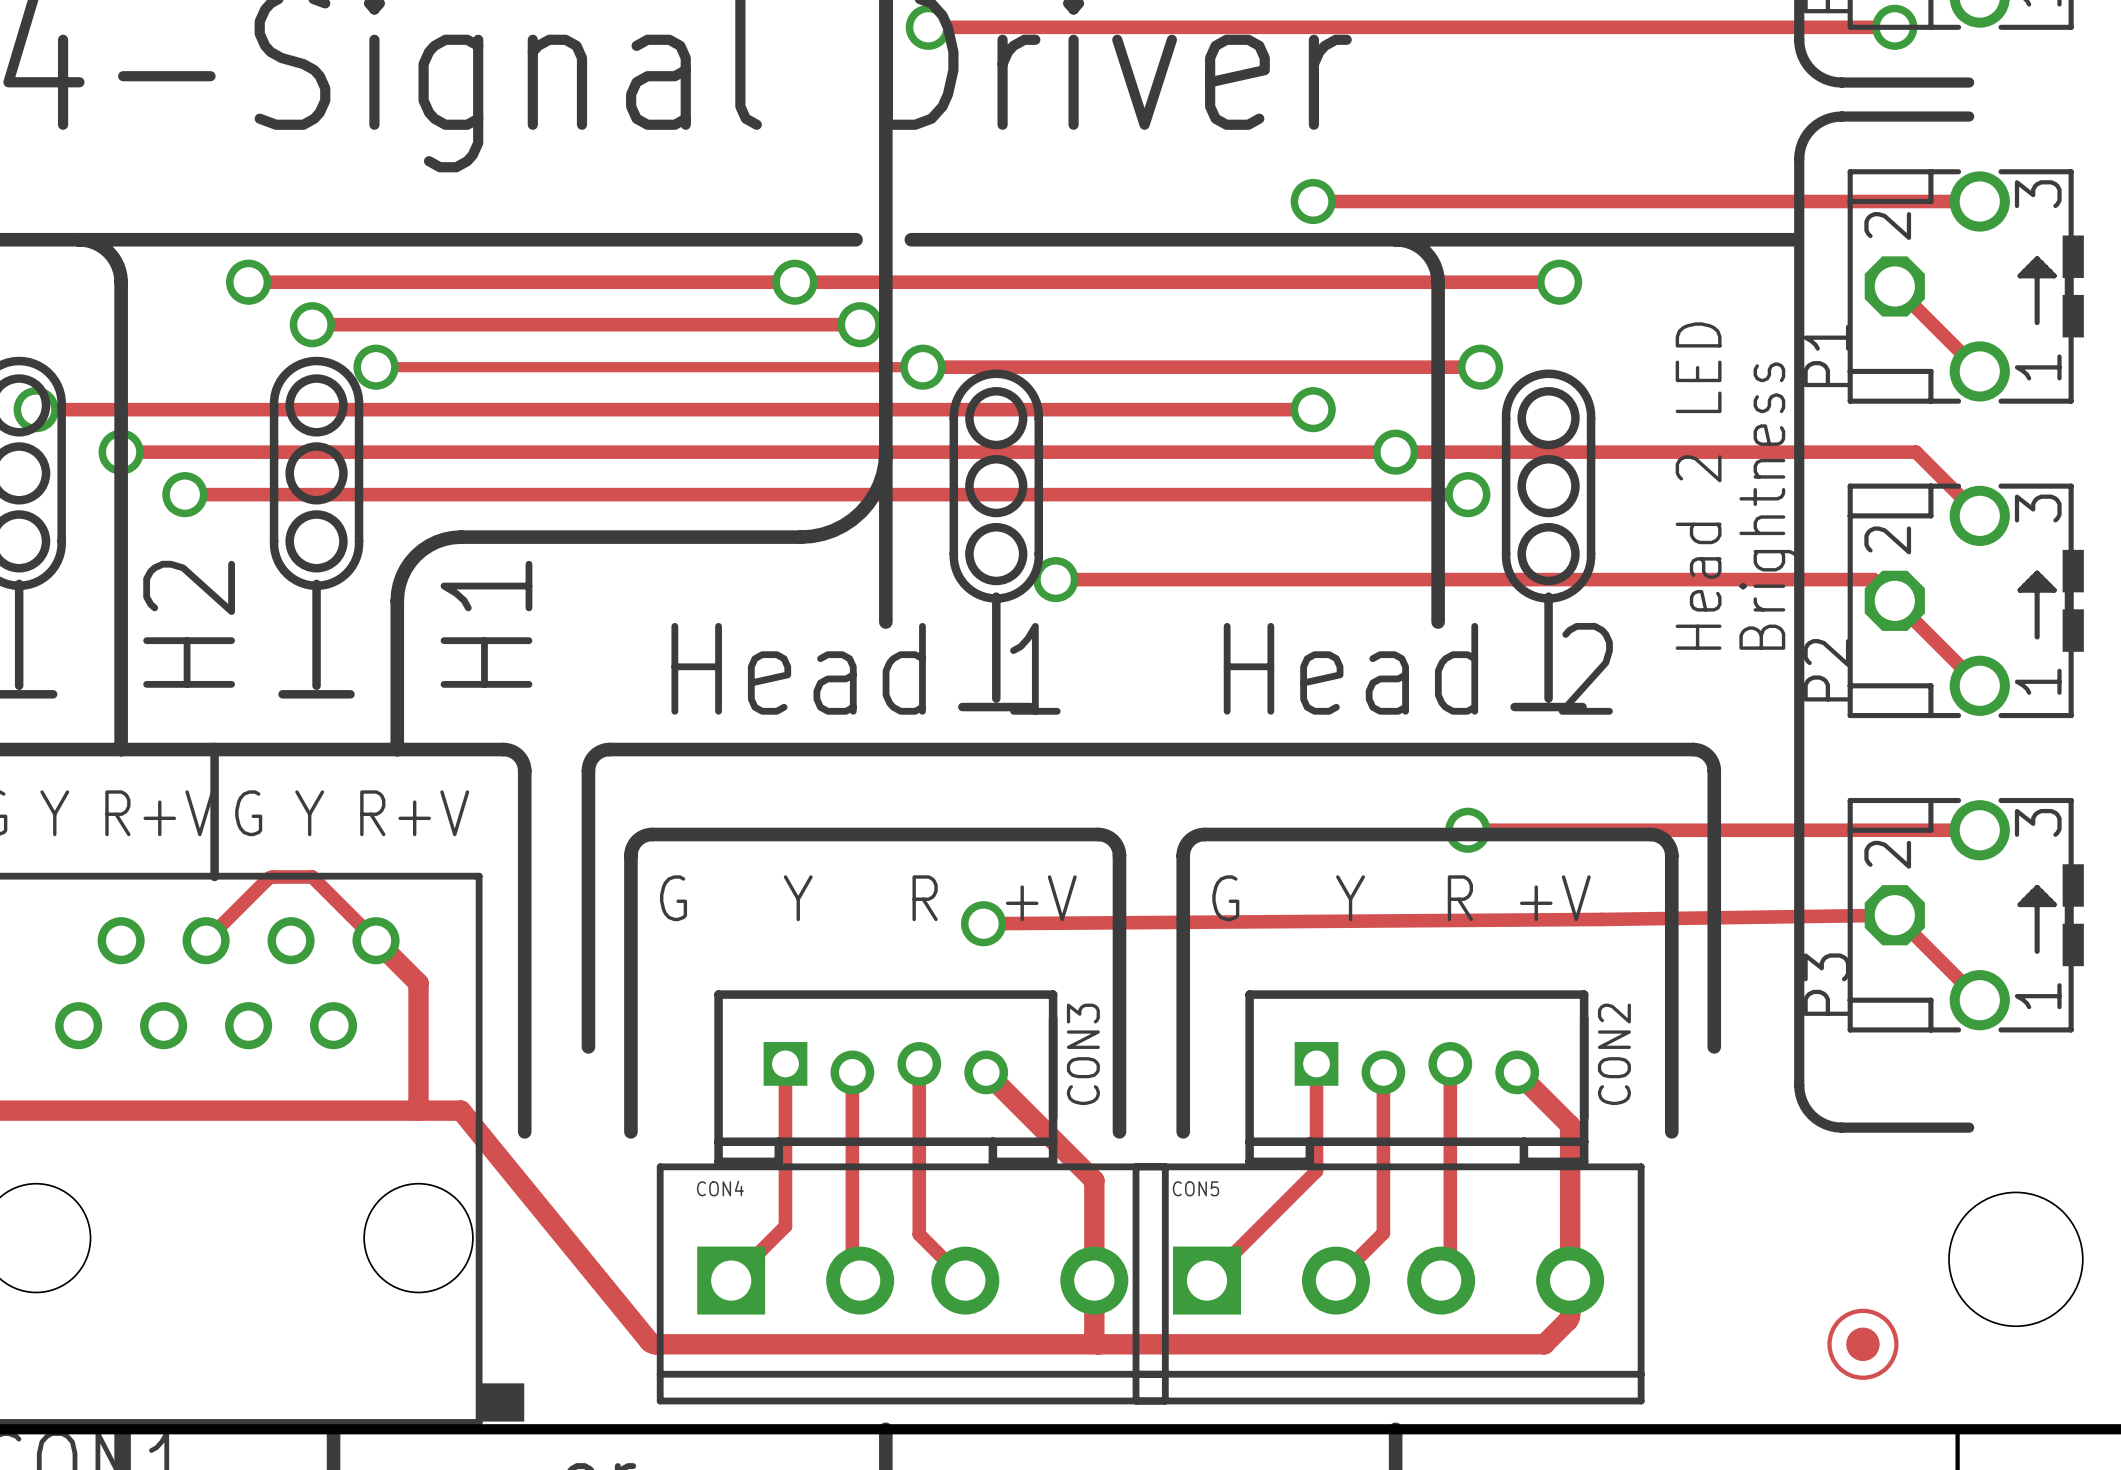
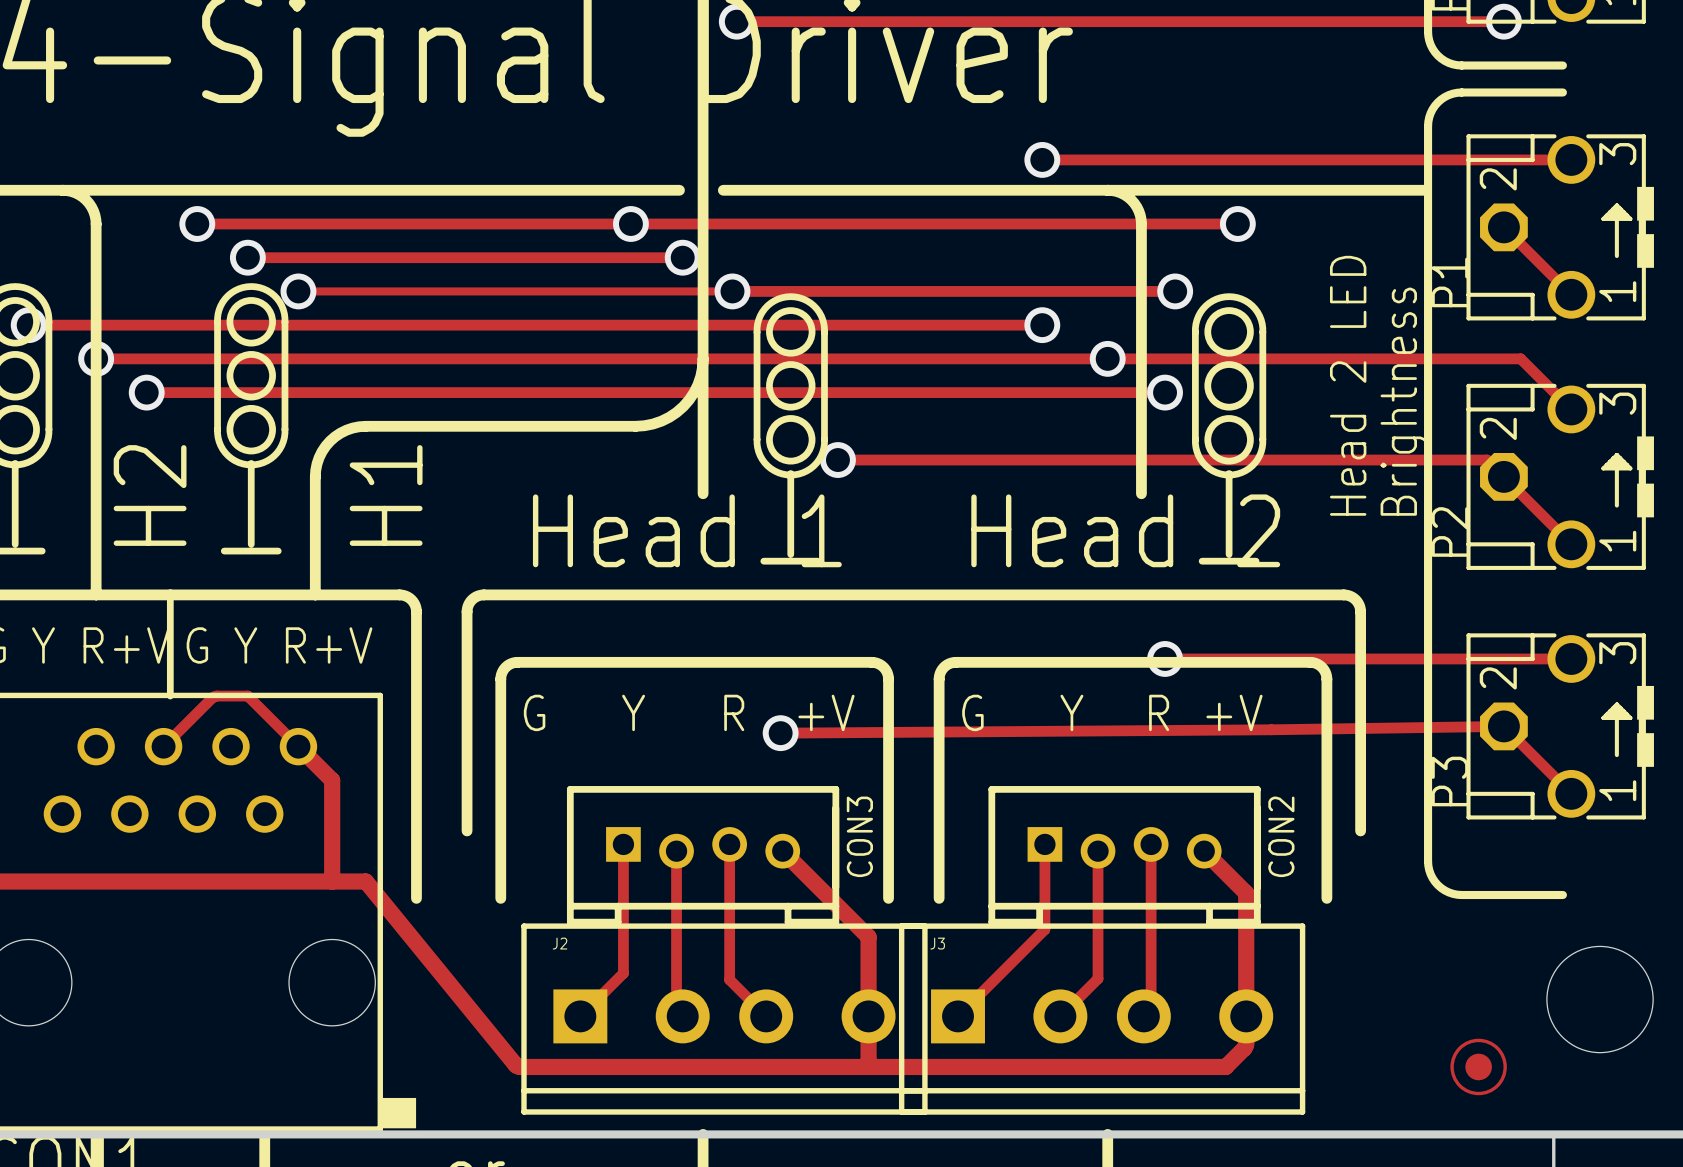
CON4 name: CON4 (720, 1188) -> J2 (560, 943)
CON5 name: CON5 (1195, 1188) -> J3 (937, 943)

